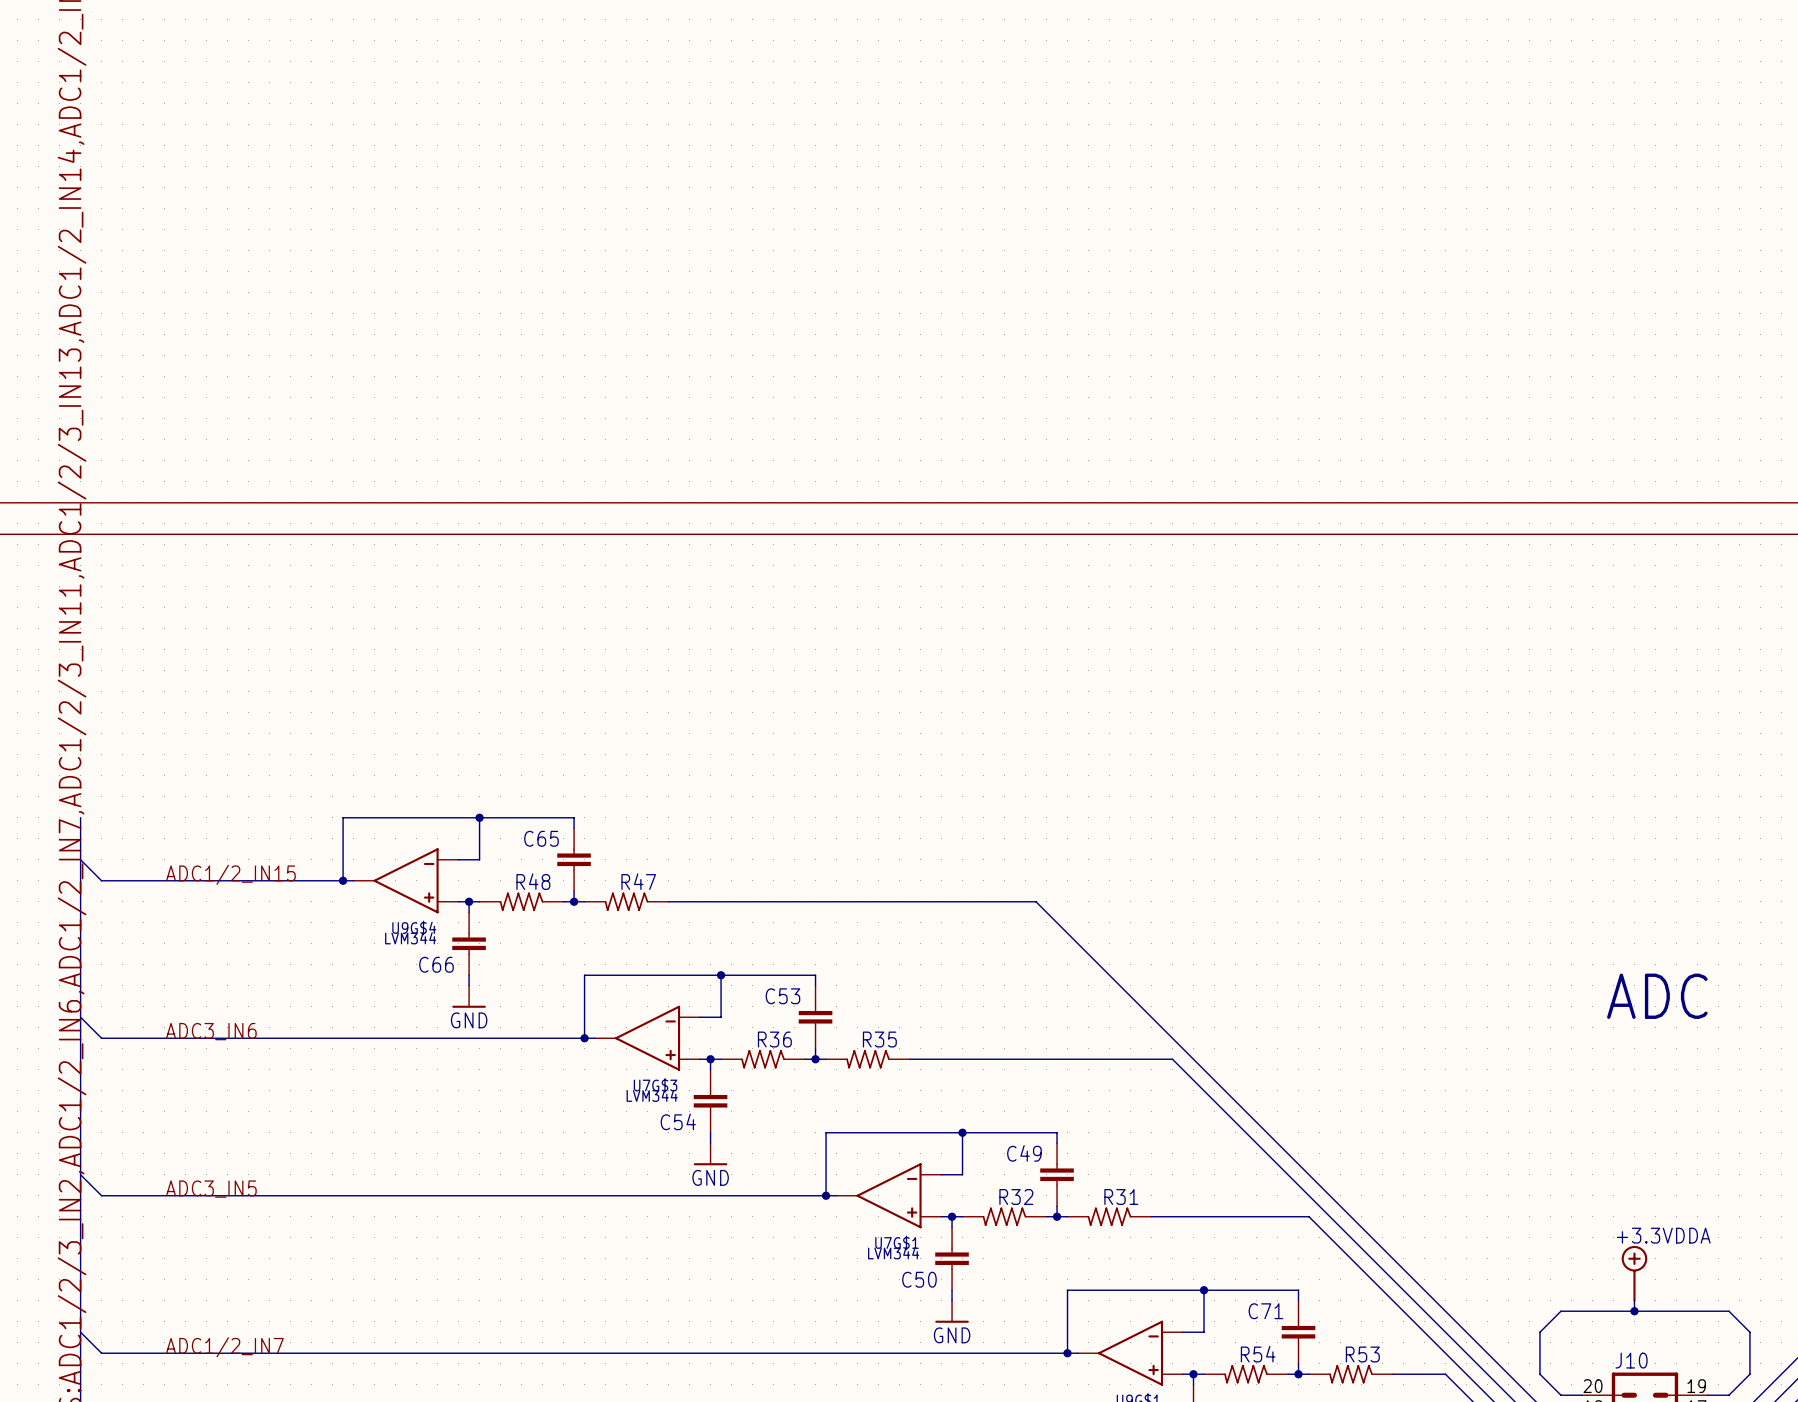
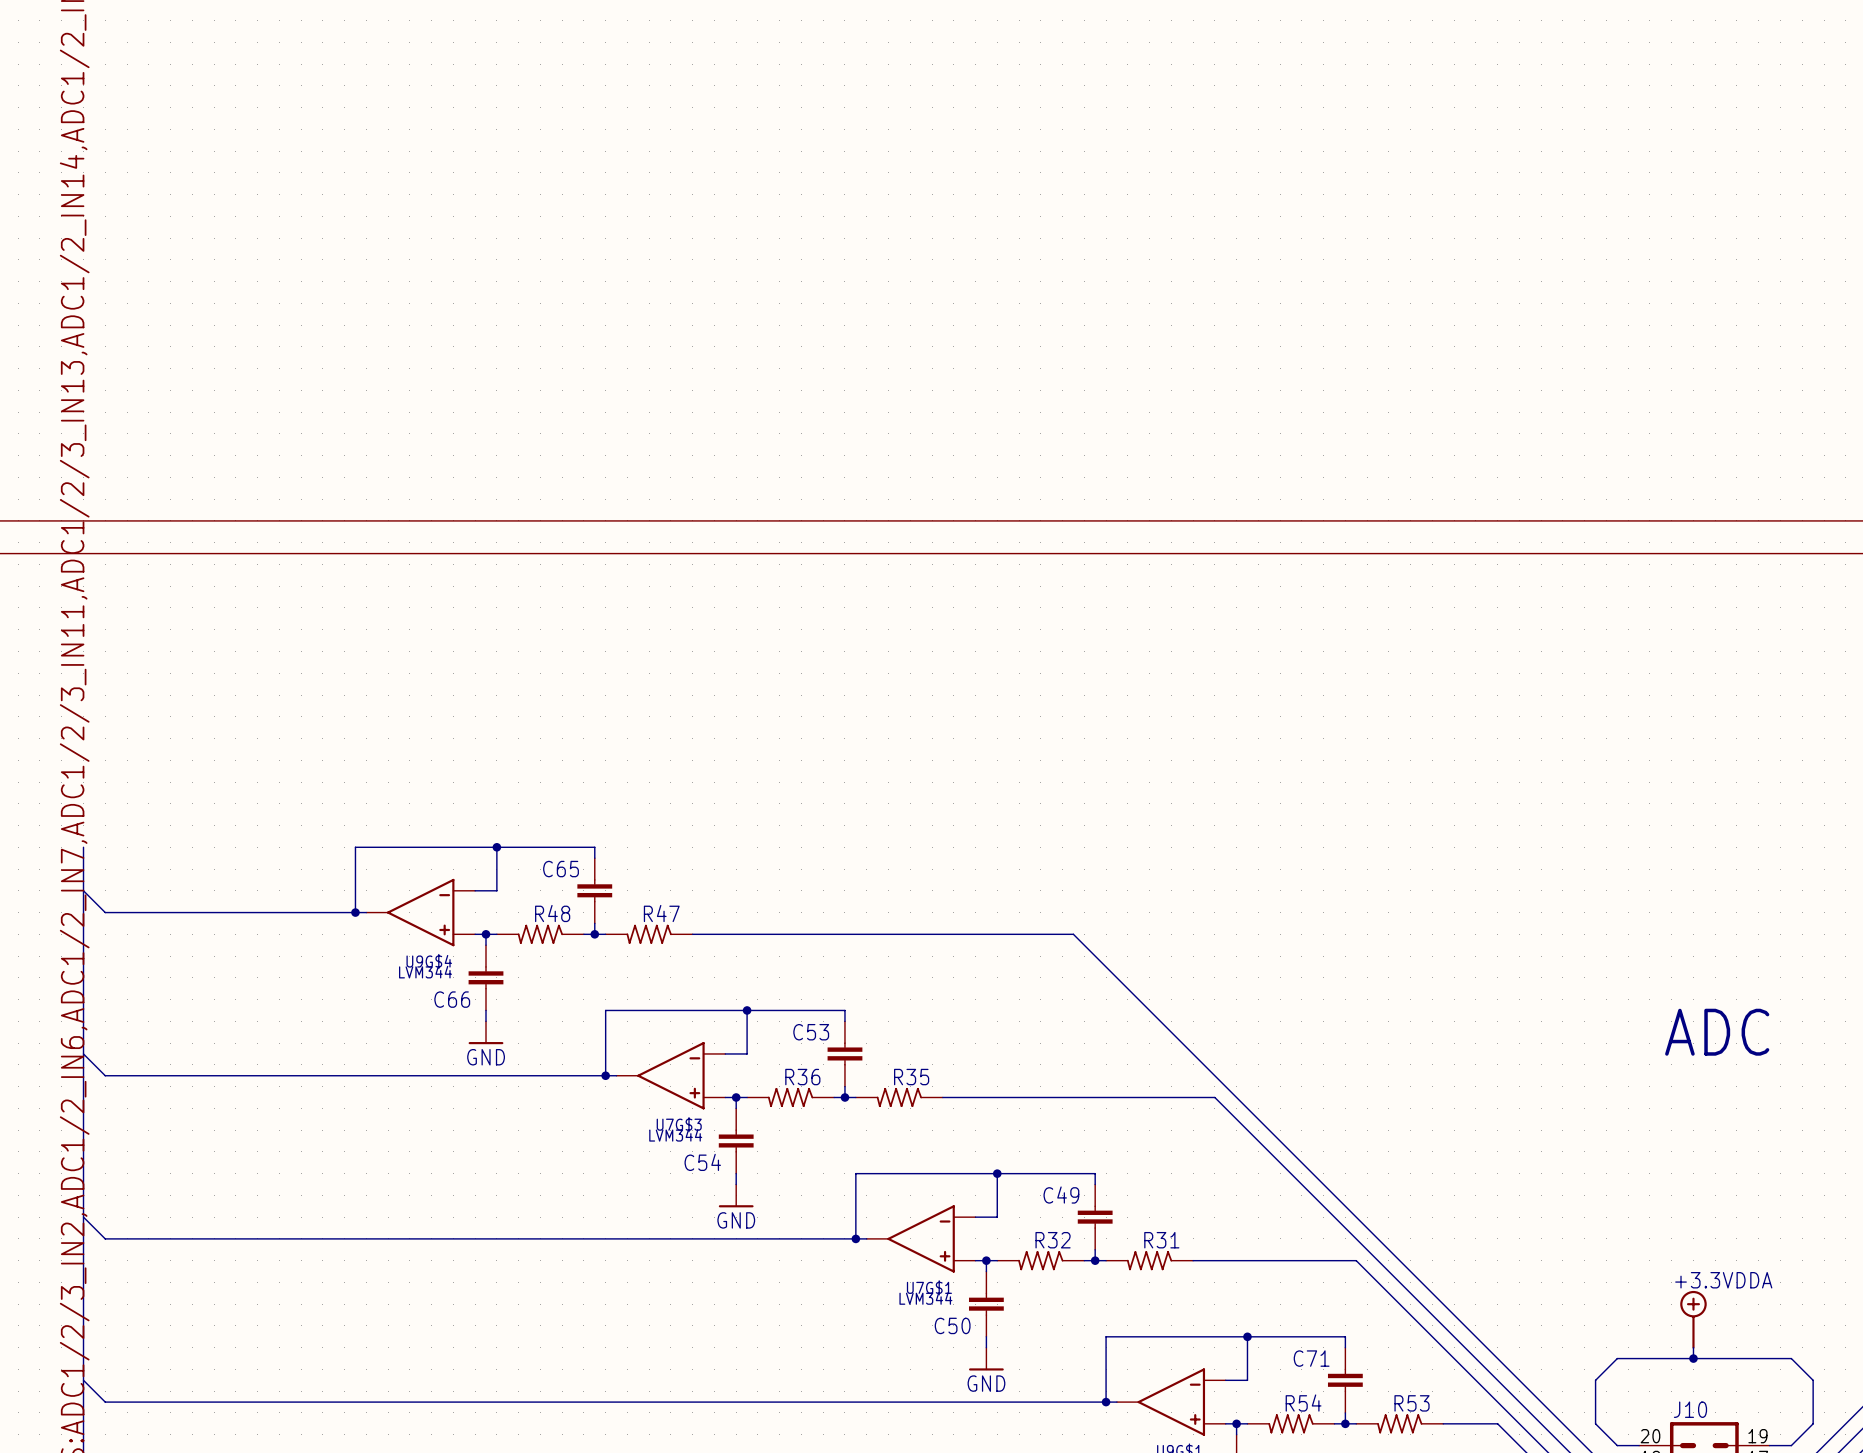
label: ADC1/2_IN15 (230, 874) -> none
label: ADC3_IN6 (211, 1031) -> none
label: ADC3_IN5 (211, 1189) -> none
label: ADC1/2_IN7 (224, 1347) -> none

